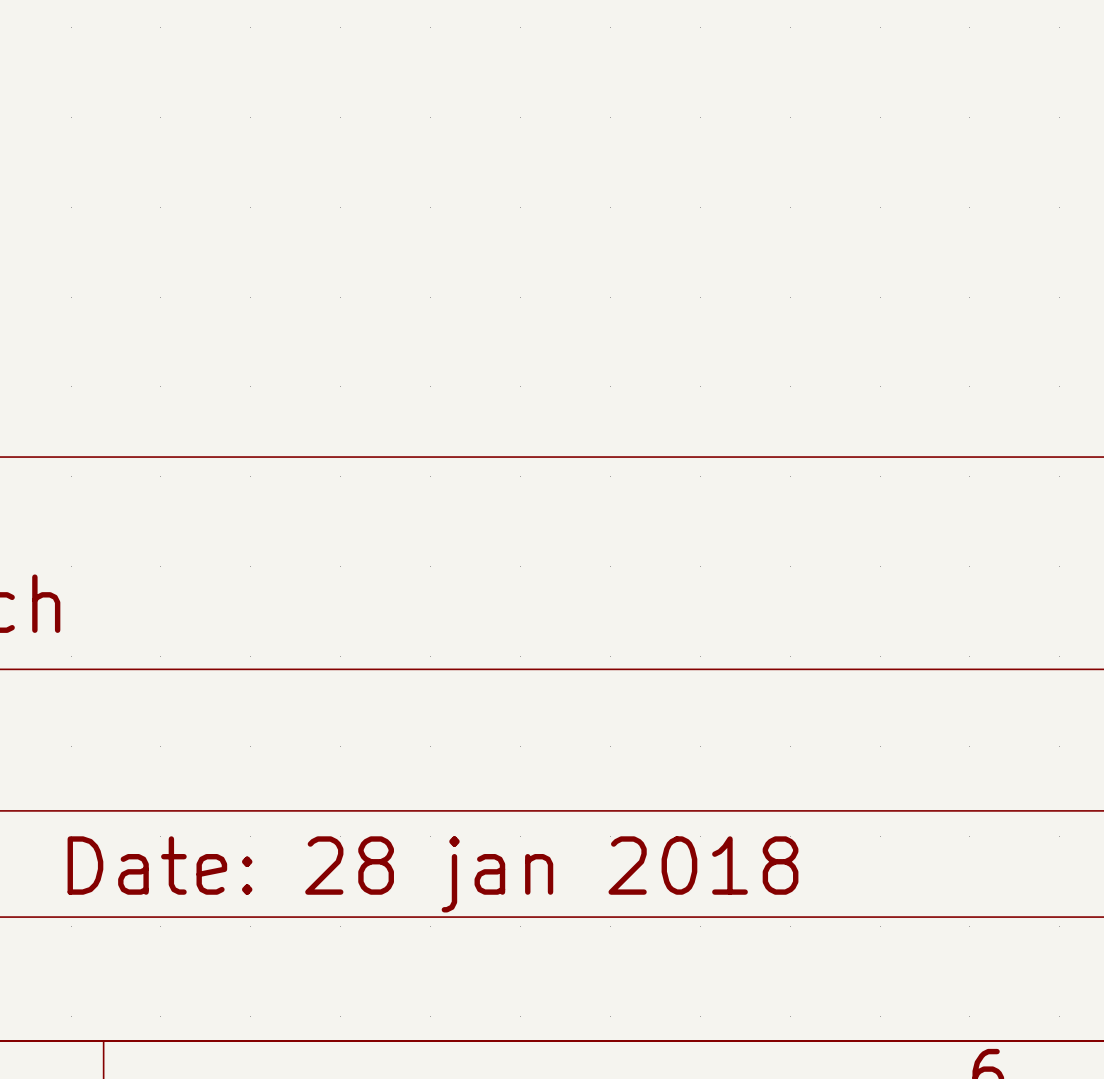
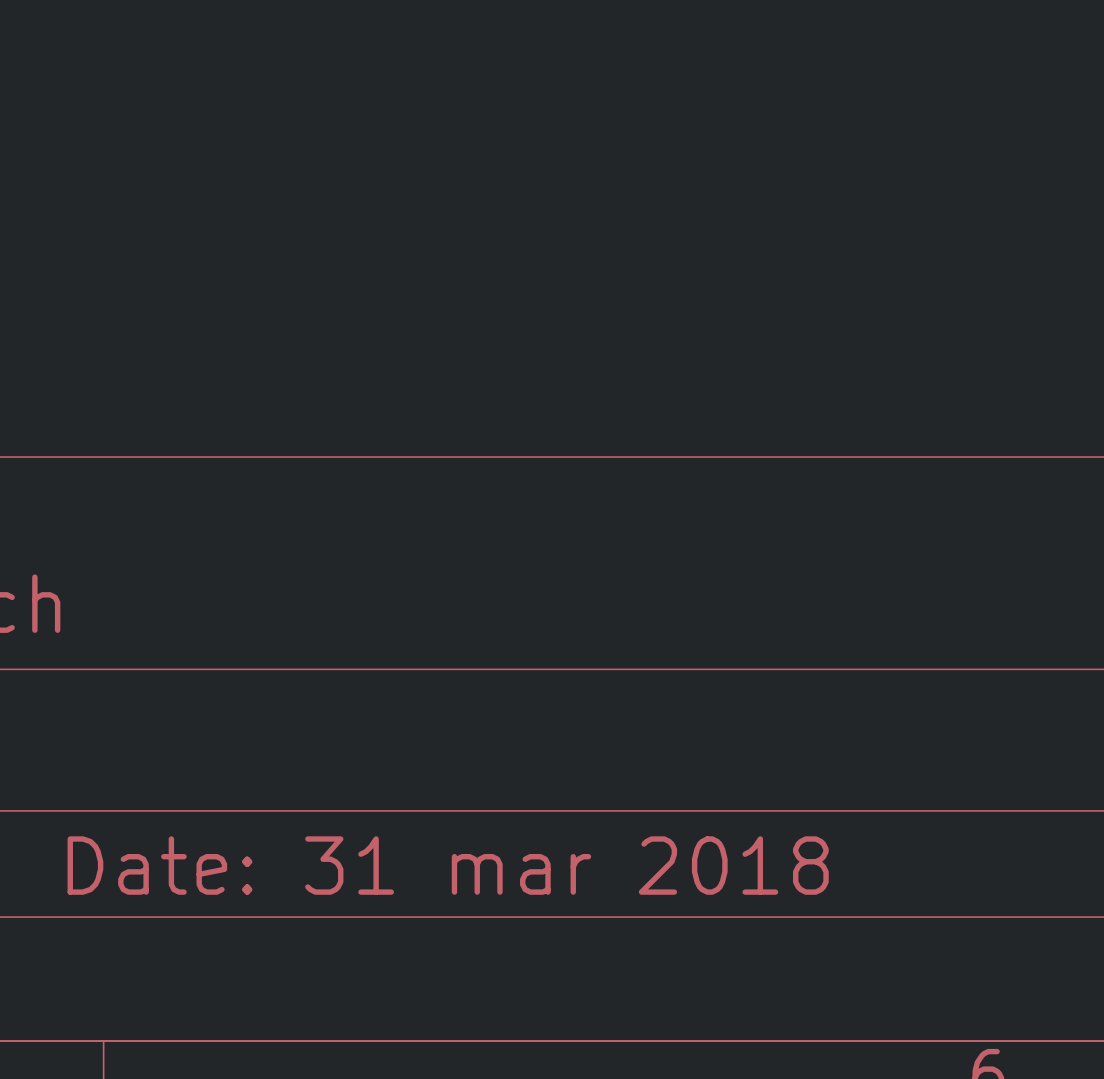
title block: Date: 28 jan 2018 (432, 874) -> Date: 31 mar 2018 (448, 865)

